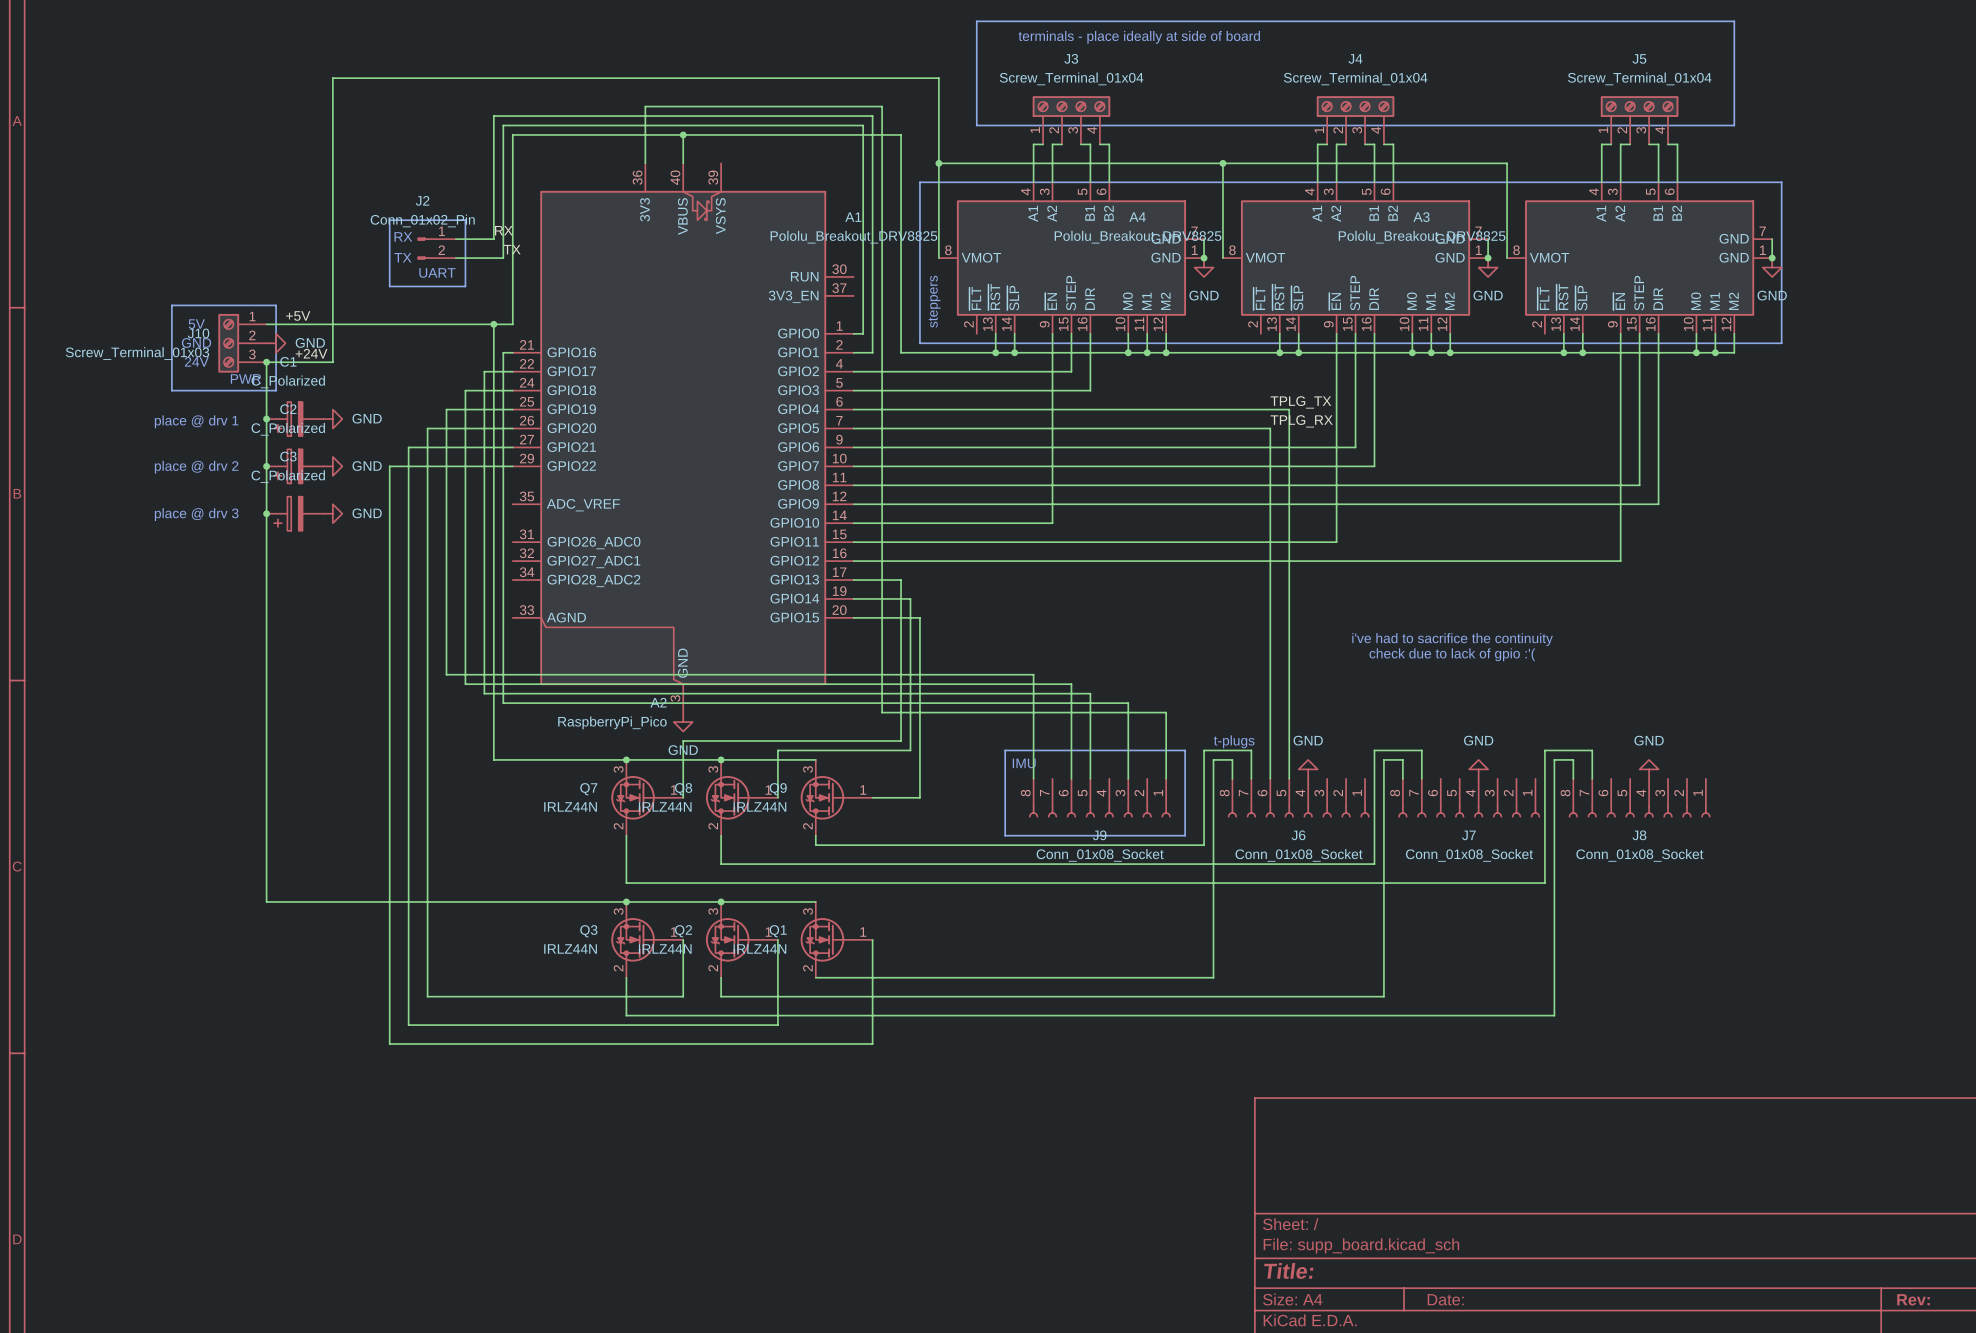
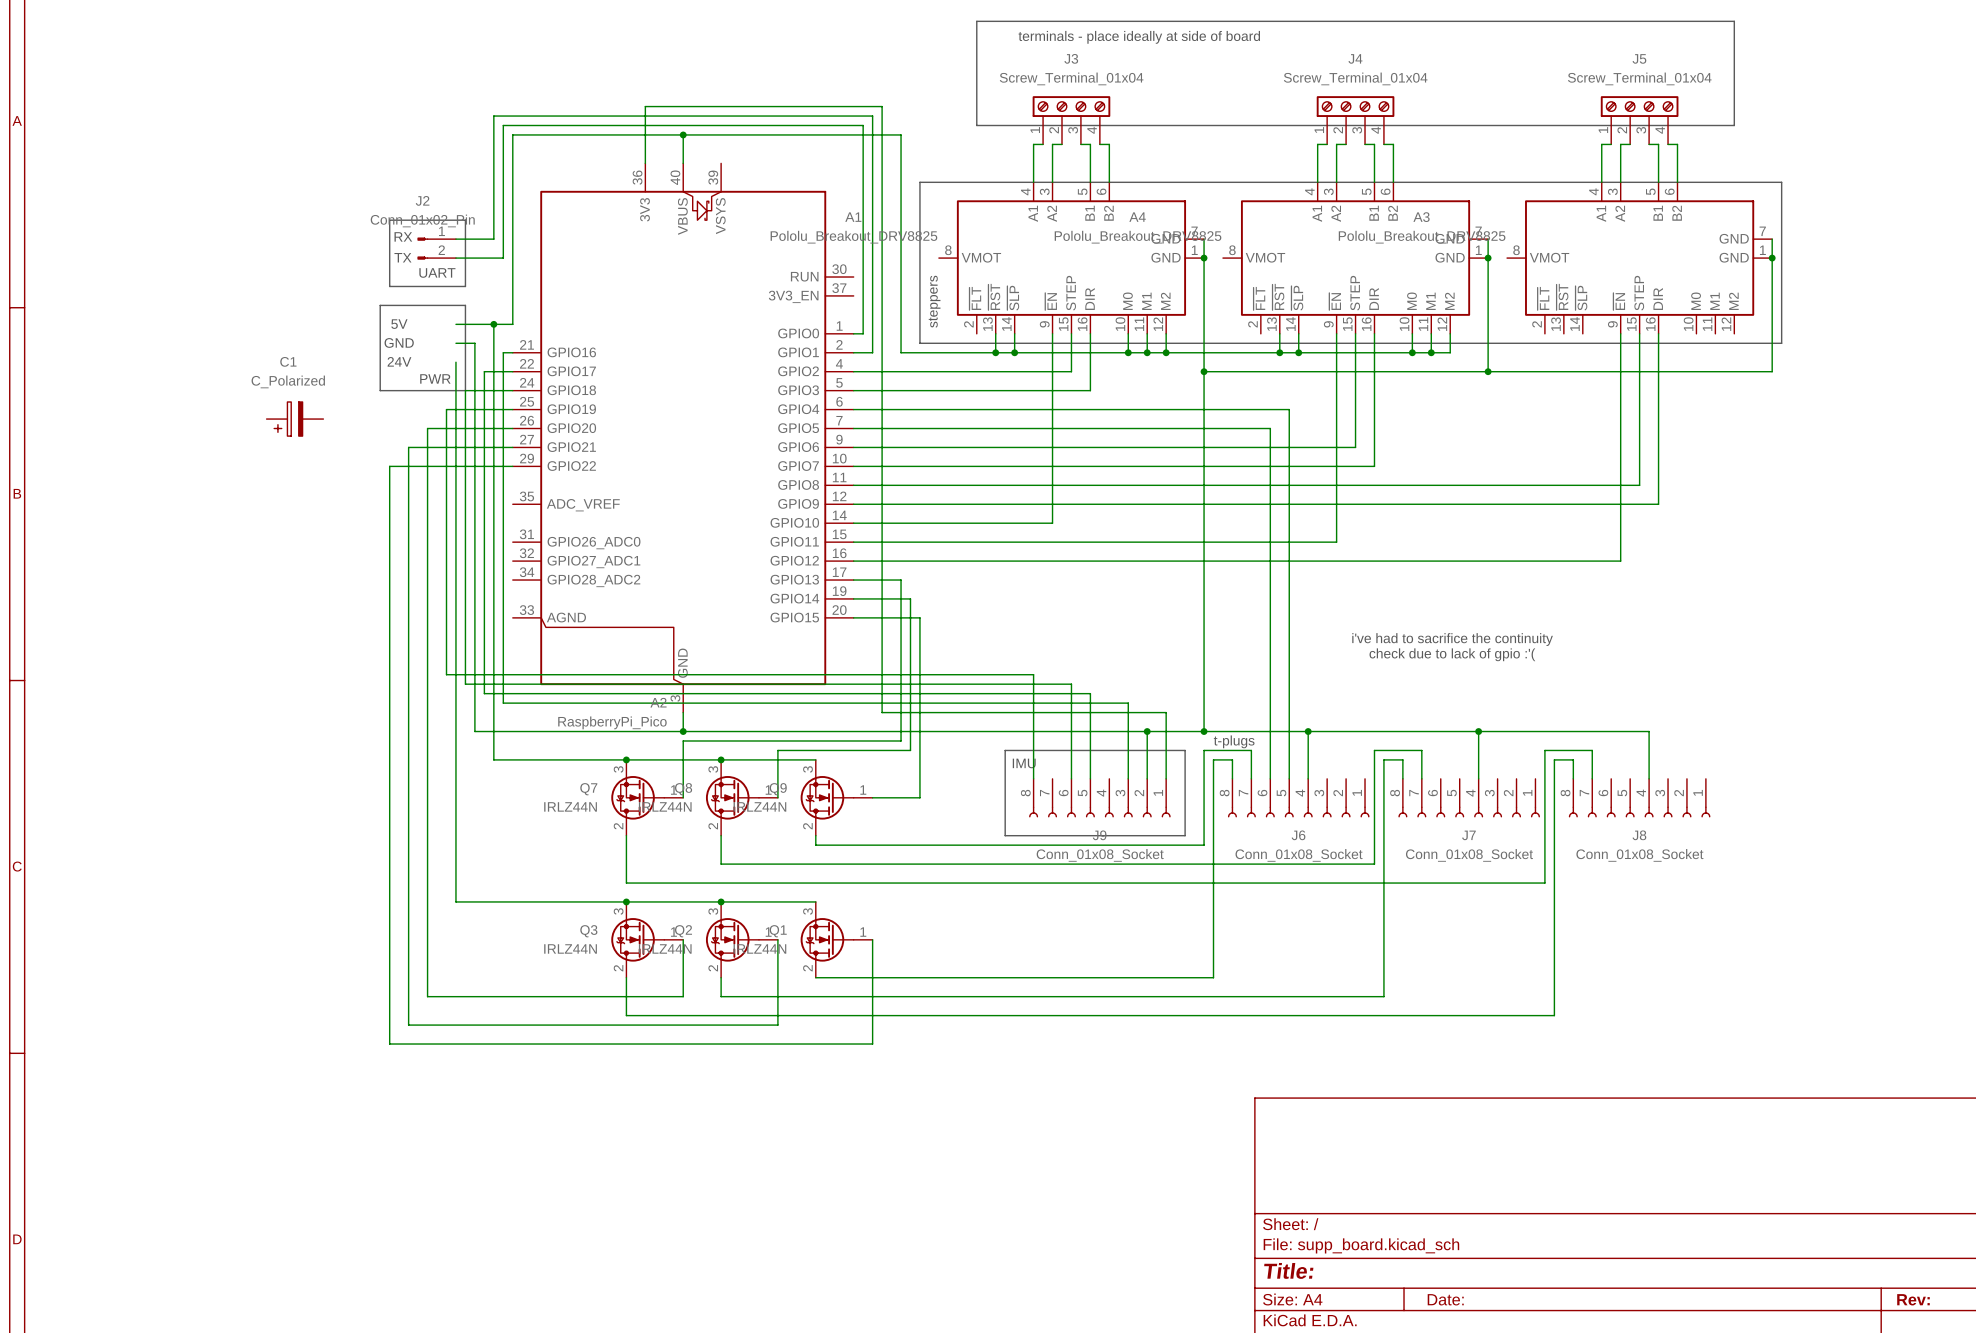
wire: (938, 163) (1507, 163) (1507, 258) -> none
junction: (938, 163) -> none
wire: (1222, 163) (1222, 258) -> none
junction: (1222, 163) -> none
label: RX (503, 230) -> none
label: TX (512, 249) -> none
wire: (938, 258) (938, 78) (332, 78) (332, 362) (266, 362) (266, 901) (455, 901) -> (455, 362) (455, 901)
wire: none -> (1204, 258) (1204, 731)
wire: none -> (1488, 258) (1488, 371)
wire: none -> (1772, 258) (1772, 371) (1204, 371)
power symbol: GND (1204, 267) -> none
power symbol: GND (1488, 267) -> none
power symbol: GND (1772, 267) -> none
line: (171, 305) (276, 305) (276, 390) (171, 390) (171, 305) -> none
line: none -> (380, 305) (465, 305) (465, 390) (380, 390) (380, 305)
label: +5V (298, 315) -> none
text: 5V (196, 324) -> none
wire: (266, 324) (455, 324) -> none
text: none -> 5V (399, 324)
wire: (1563, 333) (1563, 352) -> none
wire: (1582, 333) (1582, 352) -> none
wire: (1696, 333) (1696, 352) -> none
wire: (1715, 333) (1715, 352) -> none
wire: (1734, 333) (1734, 352) (1450, 352) -> none
text: GND (196, 342) -> none
text: none -> GND (399, 342)
J10: Screw_Terminal_01x03 (242, 343) -> none
power symbol: GND (276, 343) -> none
wire: none -> (455, 343) (474, 343) (474, 731) (1649, 731) (1649, 778)
junction: (1450, 352) -> none
junction: (1563, 352) -> none
junction: (1582, 352) -> none
junction: (1696, 352) -> none
junction: (1715, 352) -> none
label: +24V (311, 353) -> none
text: 24V (196, 361) -> none
text: none -> 24V (399, 361)
junction: (266, 362) -> none
junction: none -> (1204, 371)
junction: none -> (1488, 371)
text: PWR (246, 378) -> none
text: none -> PWR (435, 378)
label: TPLG_TX (1300, 402) -> none
junction: (266, 419) -> none
power symbol: GND (332, 419) -> none
text: place @ drv 1 (196, 421) -> none
label: TPLG_RX (1301, 421) -> none
junction: (266, 466) -> none
C2: C_Polarized (295, 466) -> none
power symbol: GND (332, 466) -> none
text: place @ drv 2 (196, 467) -> none
junction: (266, 513) -> none
C3: C_Polarized (295, 513) -> none
power symbol: GND (332, 513) -> none
text: place @ drv 3 (196, 514) -> none
power symbol: GND (683, 722) -> none
junction: none -> (683, 731)
wire: none -> (1147, 731) (1147, 778)
junction: none -> (1147, 731)
junction: none -> (1204, 731)
wire: none -> (1308, 731) (1308, 778)
junction: none -> (1308, 731)
wire: none -> (1478, 731) (1478, 778)
junction: none -> (1478, 731)
power symbol: GND (1308, 769) -> none
power symbol: GND (1478, 769) -> none
power symbol: GND (1649, 769) -> none

